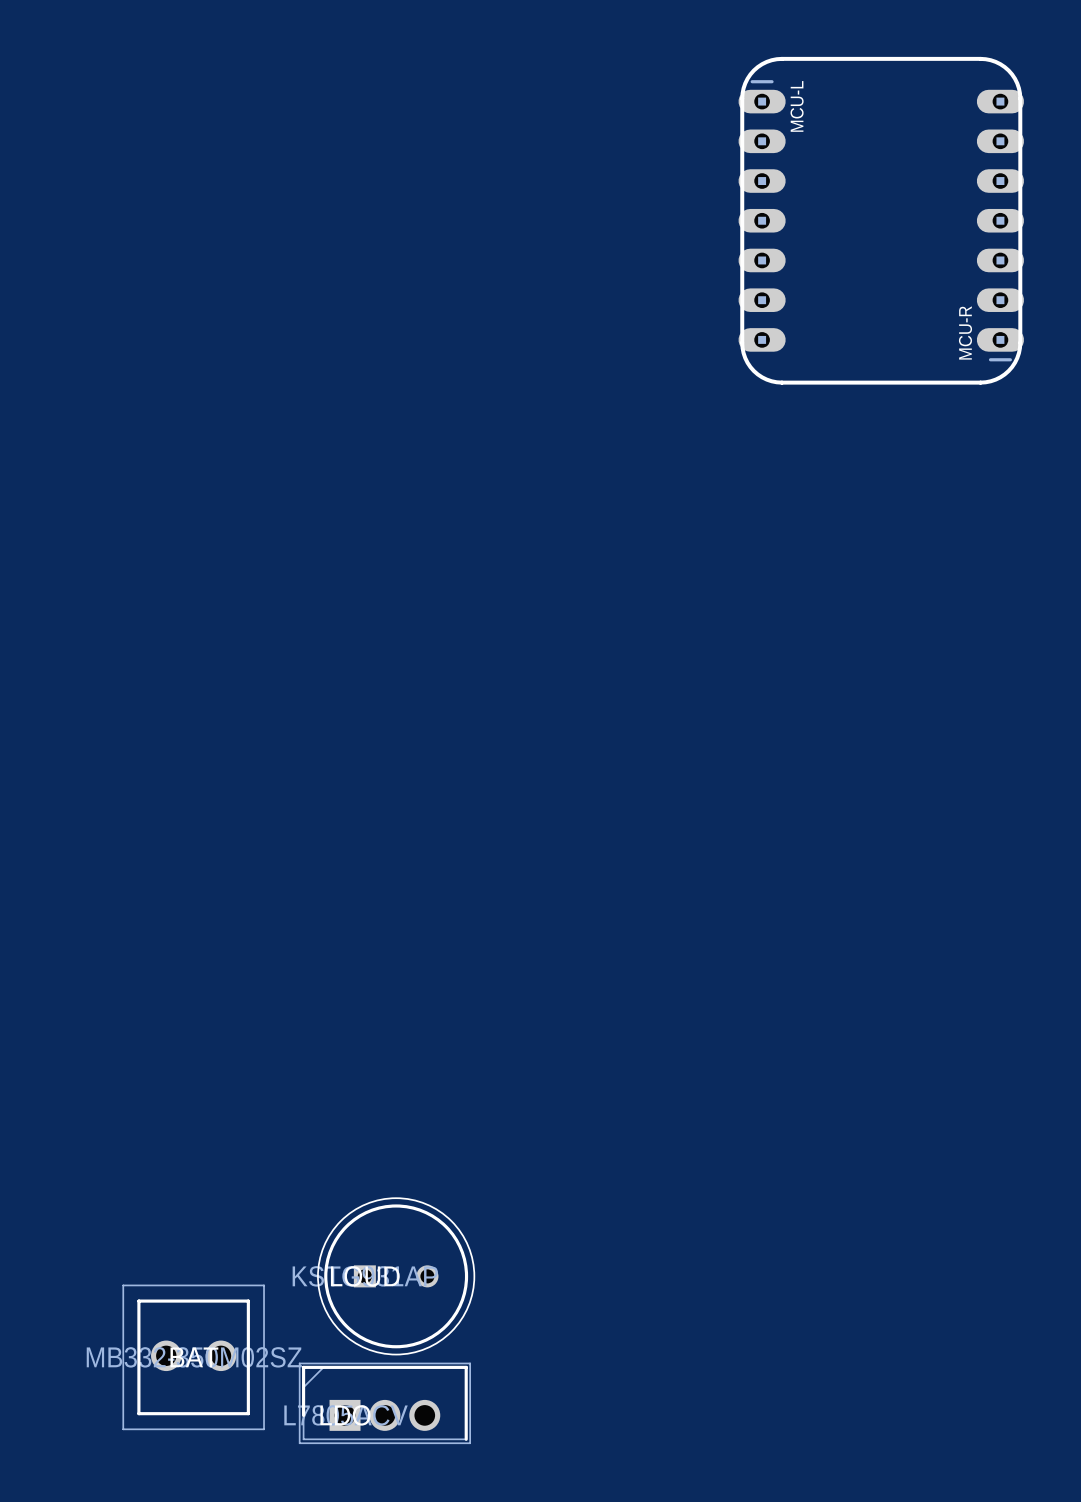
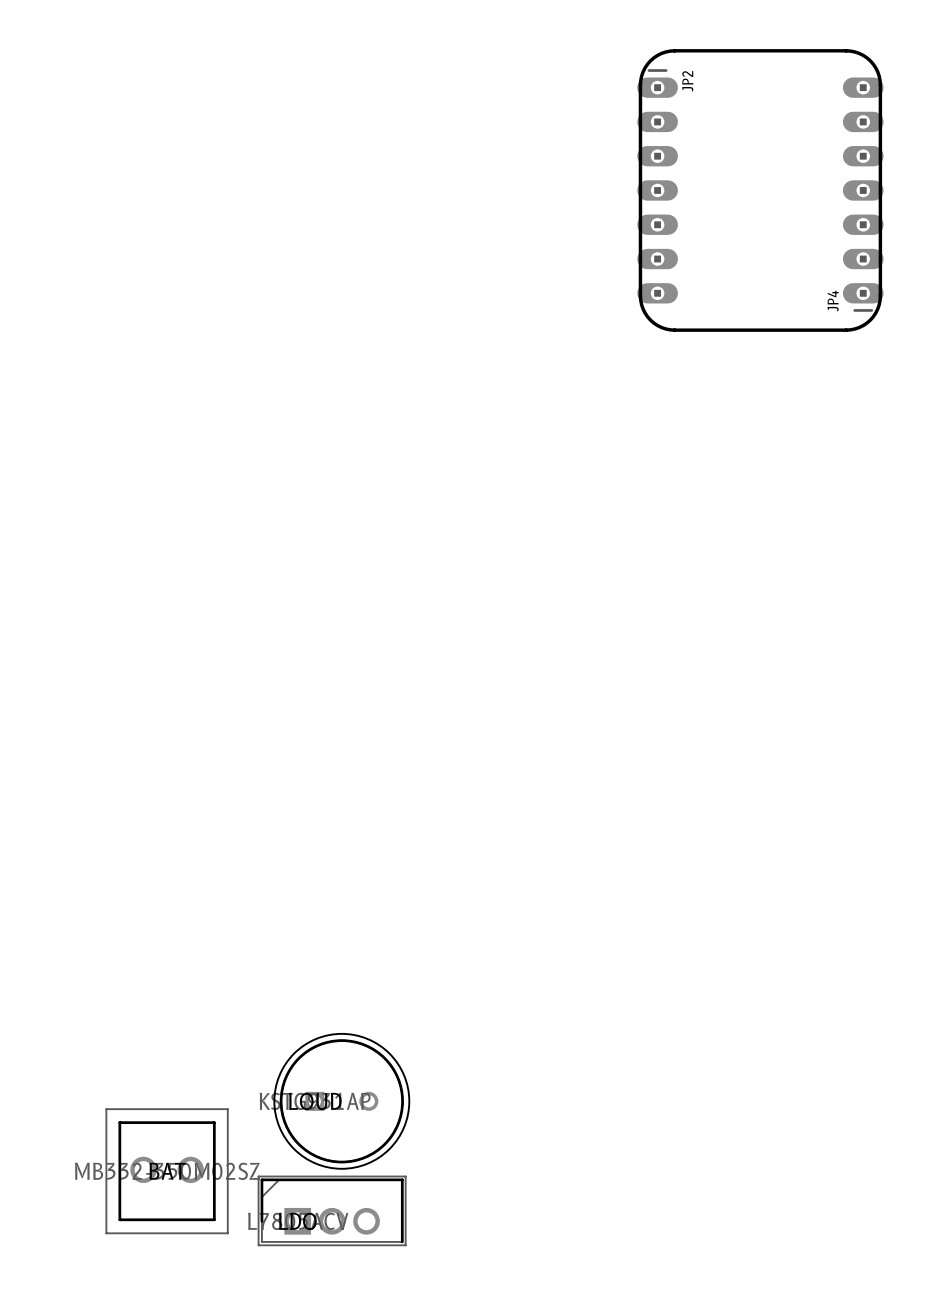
MCU-L name: MCU-L (797, 106) -> JP2 (687, 81)
MCU-R name: MCU-R (965, 332) -> JP4 (833, 301)

